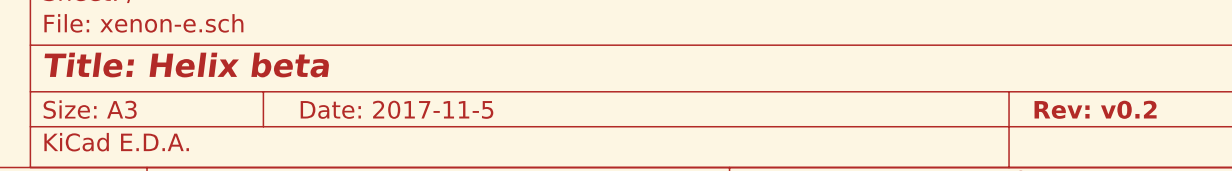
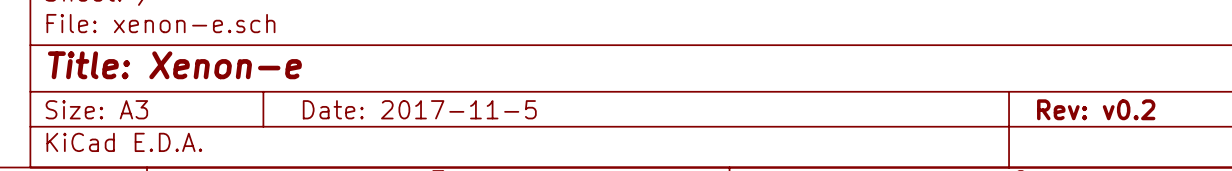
title block: Title: Helix beta (186, 65) -> Title: Xenon-e (174, 65)

